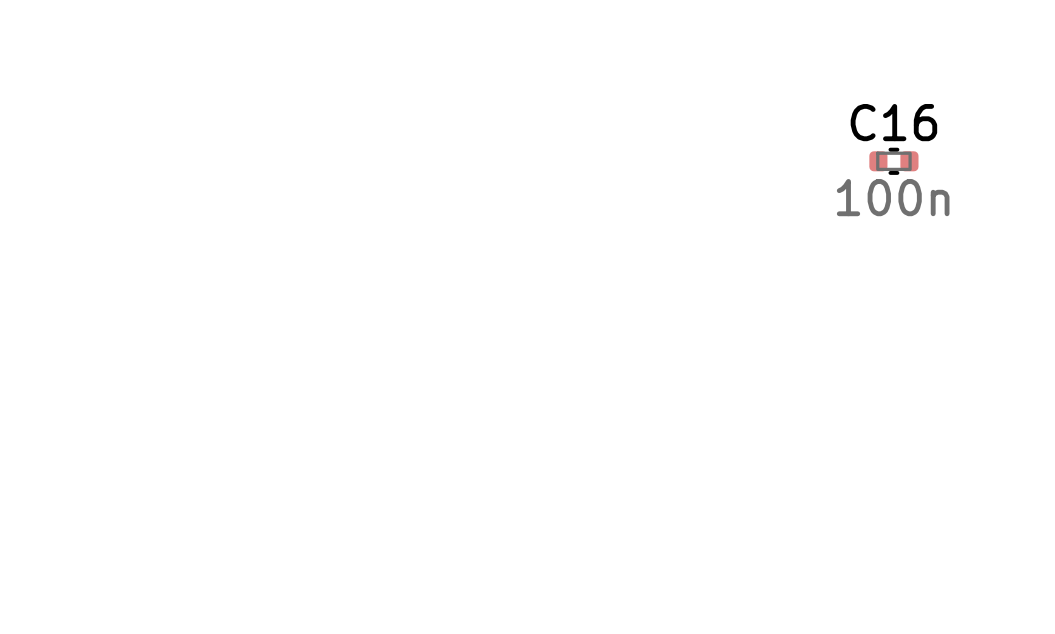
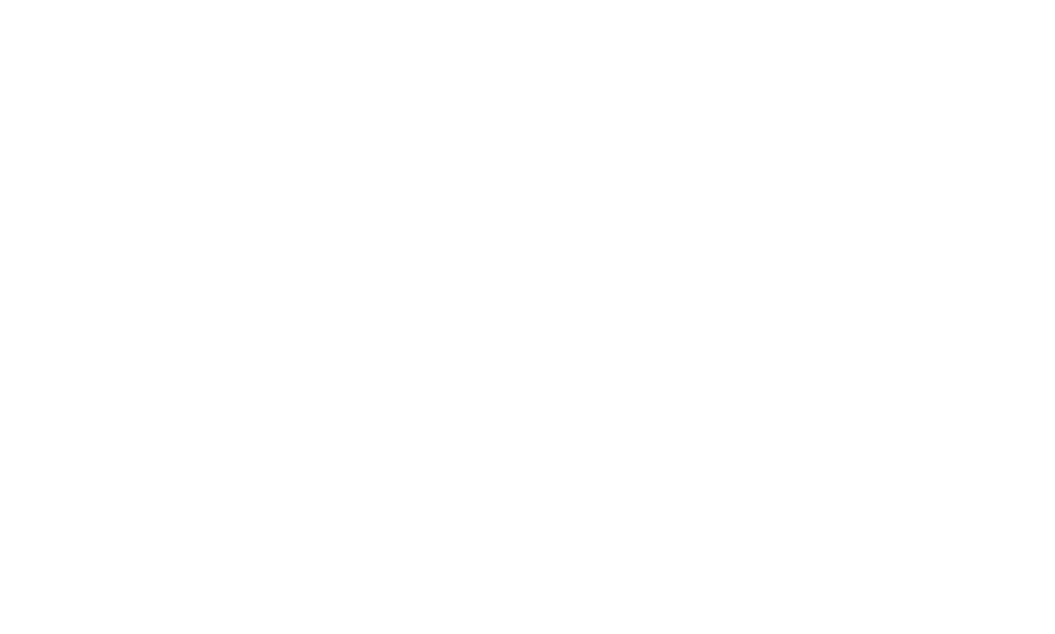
C16: 100n (893, 161) -> none

